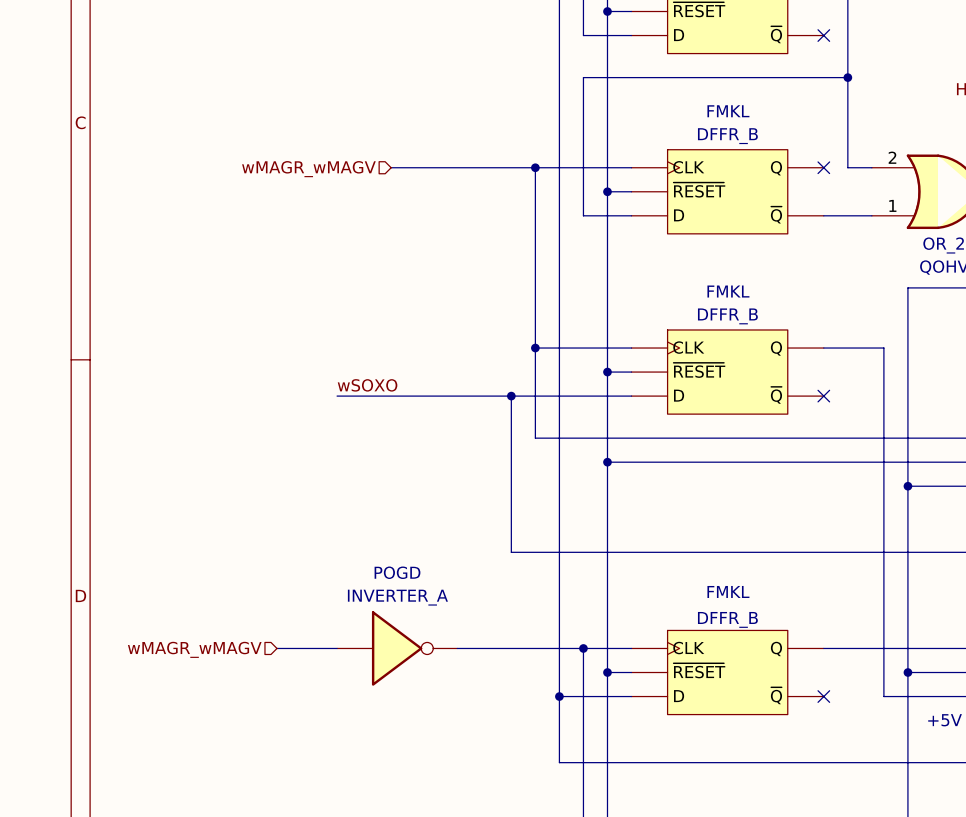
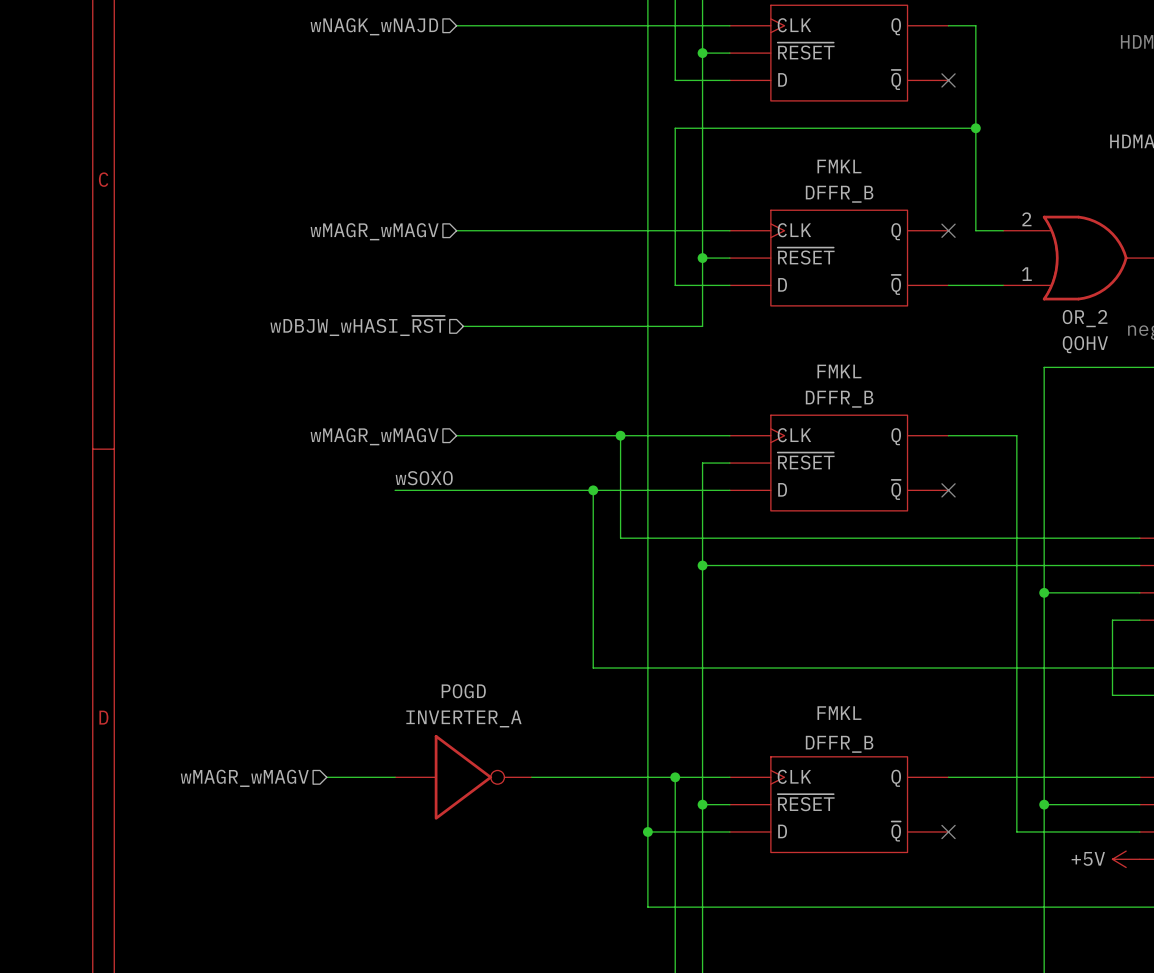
wire: (535, 167) (535, 348) -> (456, 435) (620, 435)
junction: (535, 167) -> none
hierarchical label: none -> wDBJW_wHASI_~{RST} (358, 325)
wire: (607, 251) (607, 372) -> (702, 326) (463, 326)
hierarchical label: none -> wMAGR_wMAGV (374, 436)
junction: (607, 372) -> none

